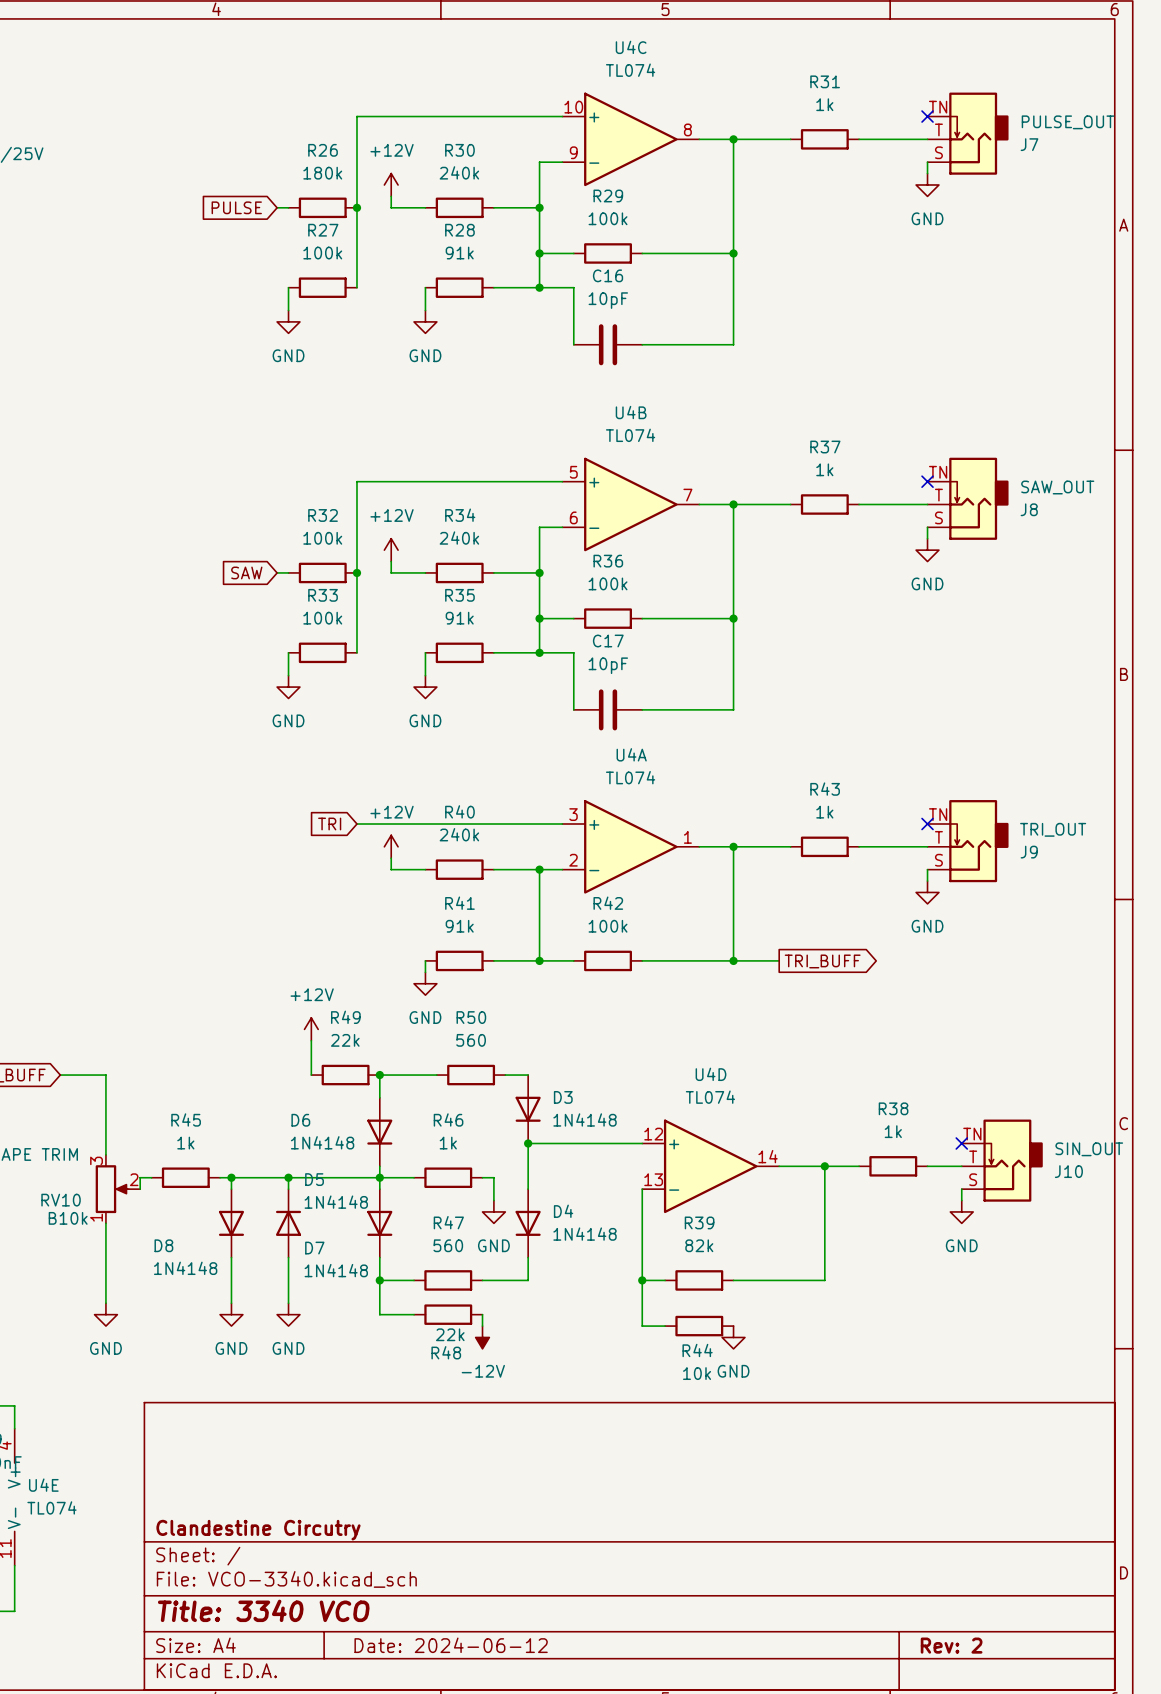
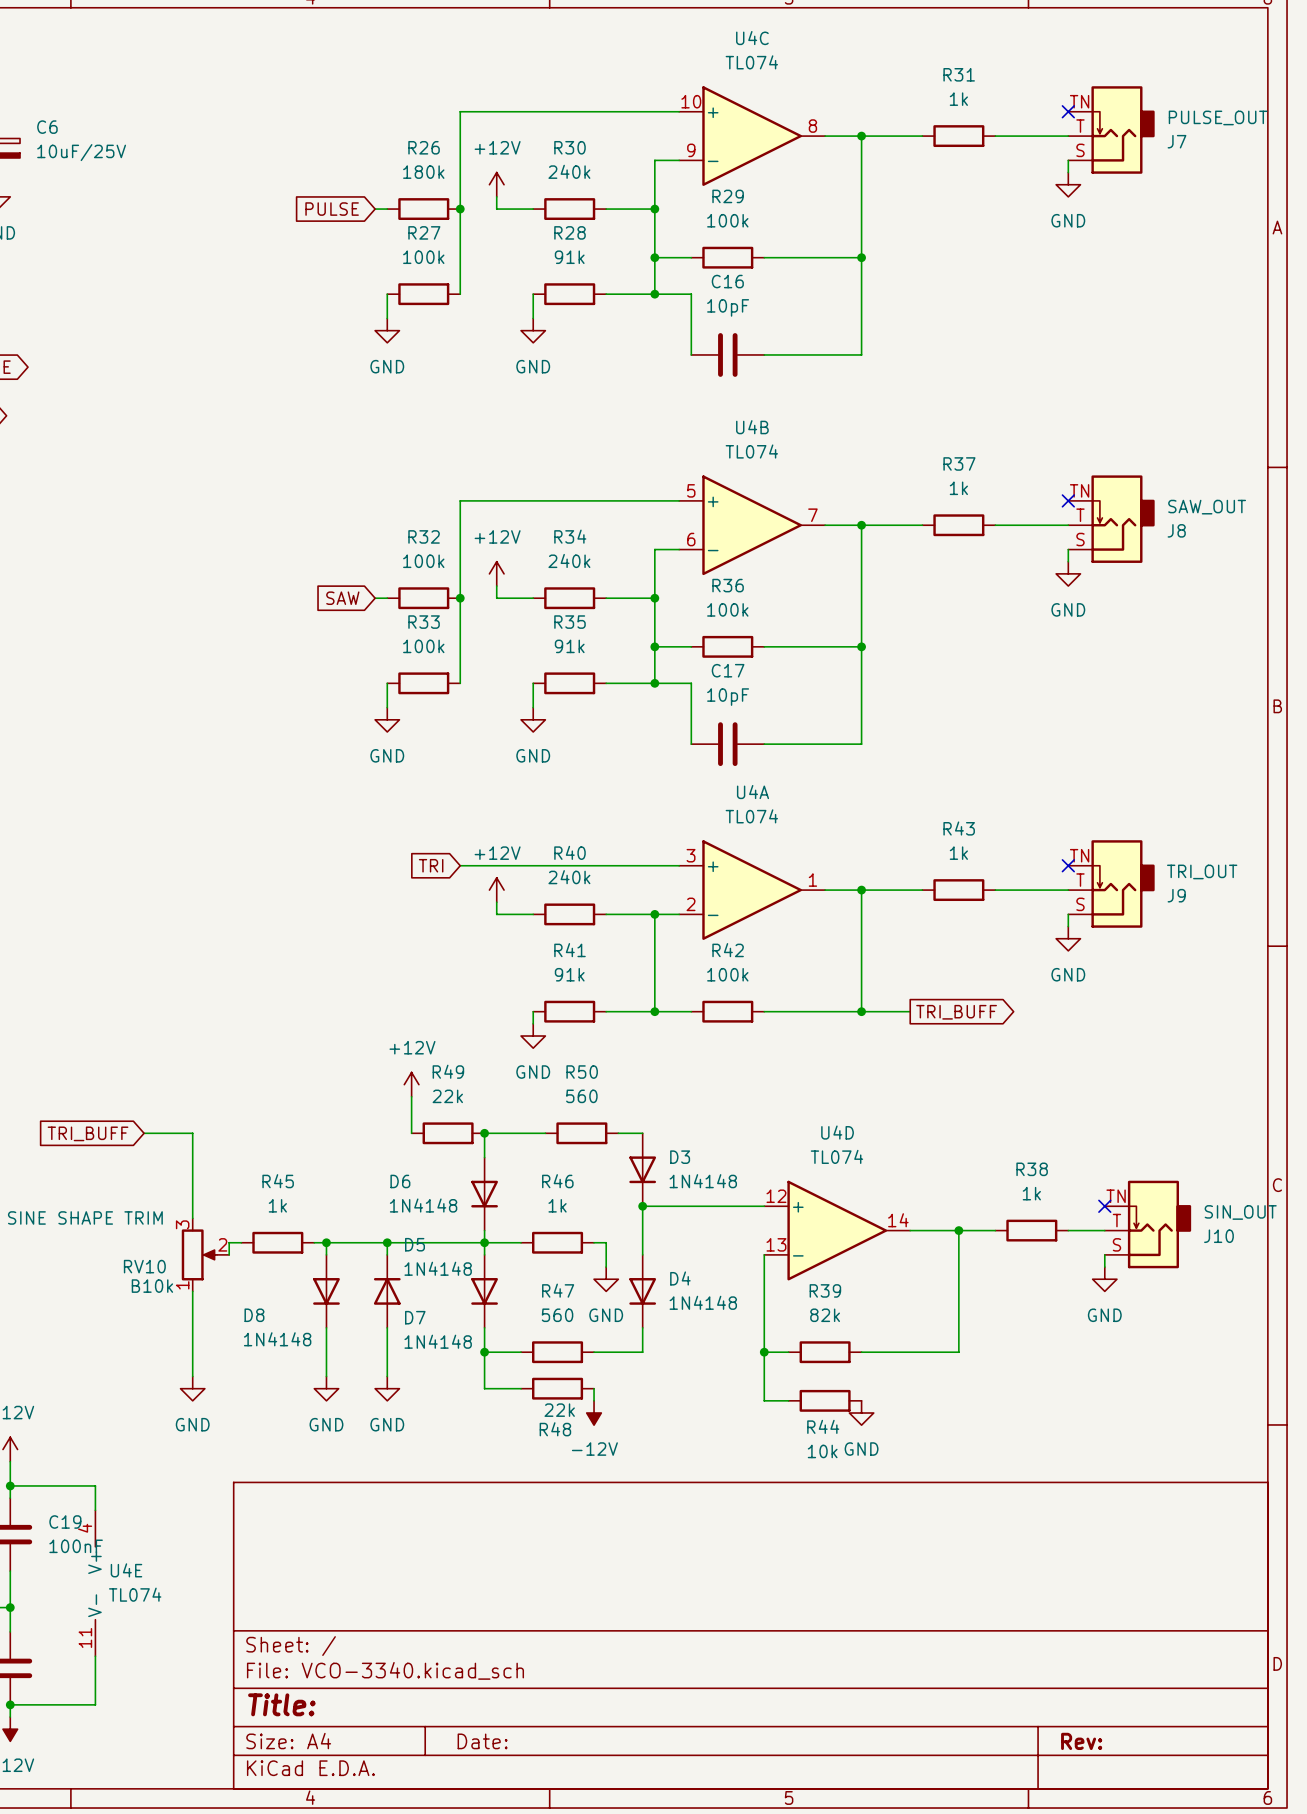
title block: Clandestine Circutry (258, 1530) -> none
title block: Title: 3340 VCO (263, 1610) -> Title: (281, 1704)
title block: Date: 2024-06-12 (451, 1645) -> Date: (482, 1741)
title block: Rev: 2 (951, 1645) -> Rev: (1081, 1741)

